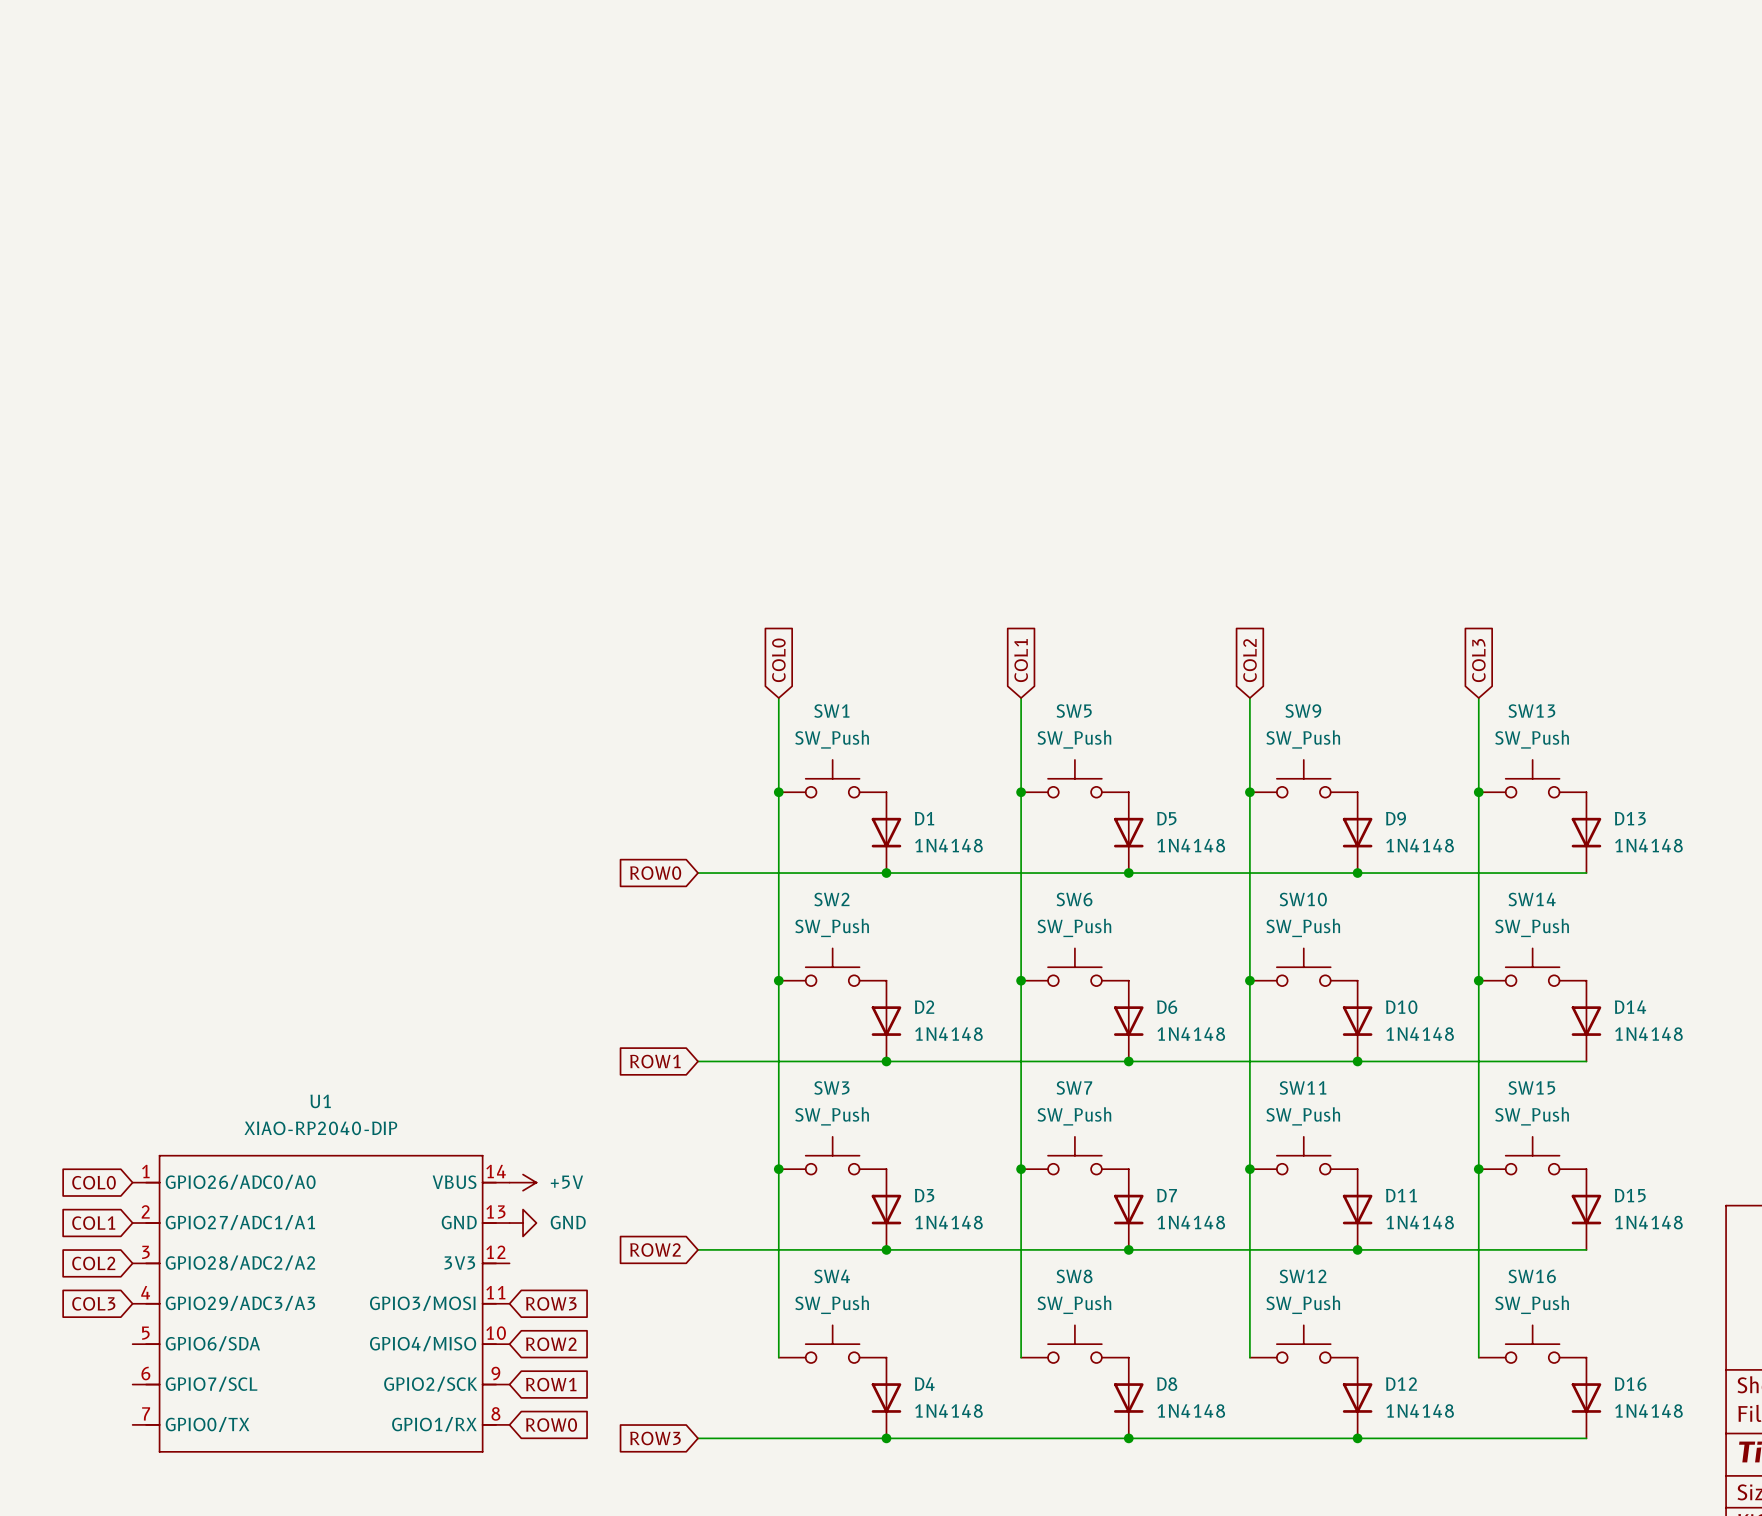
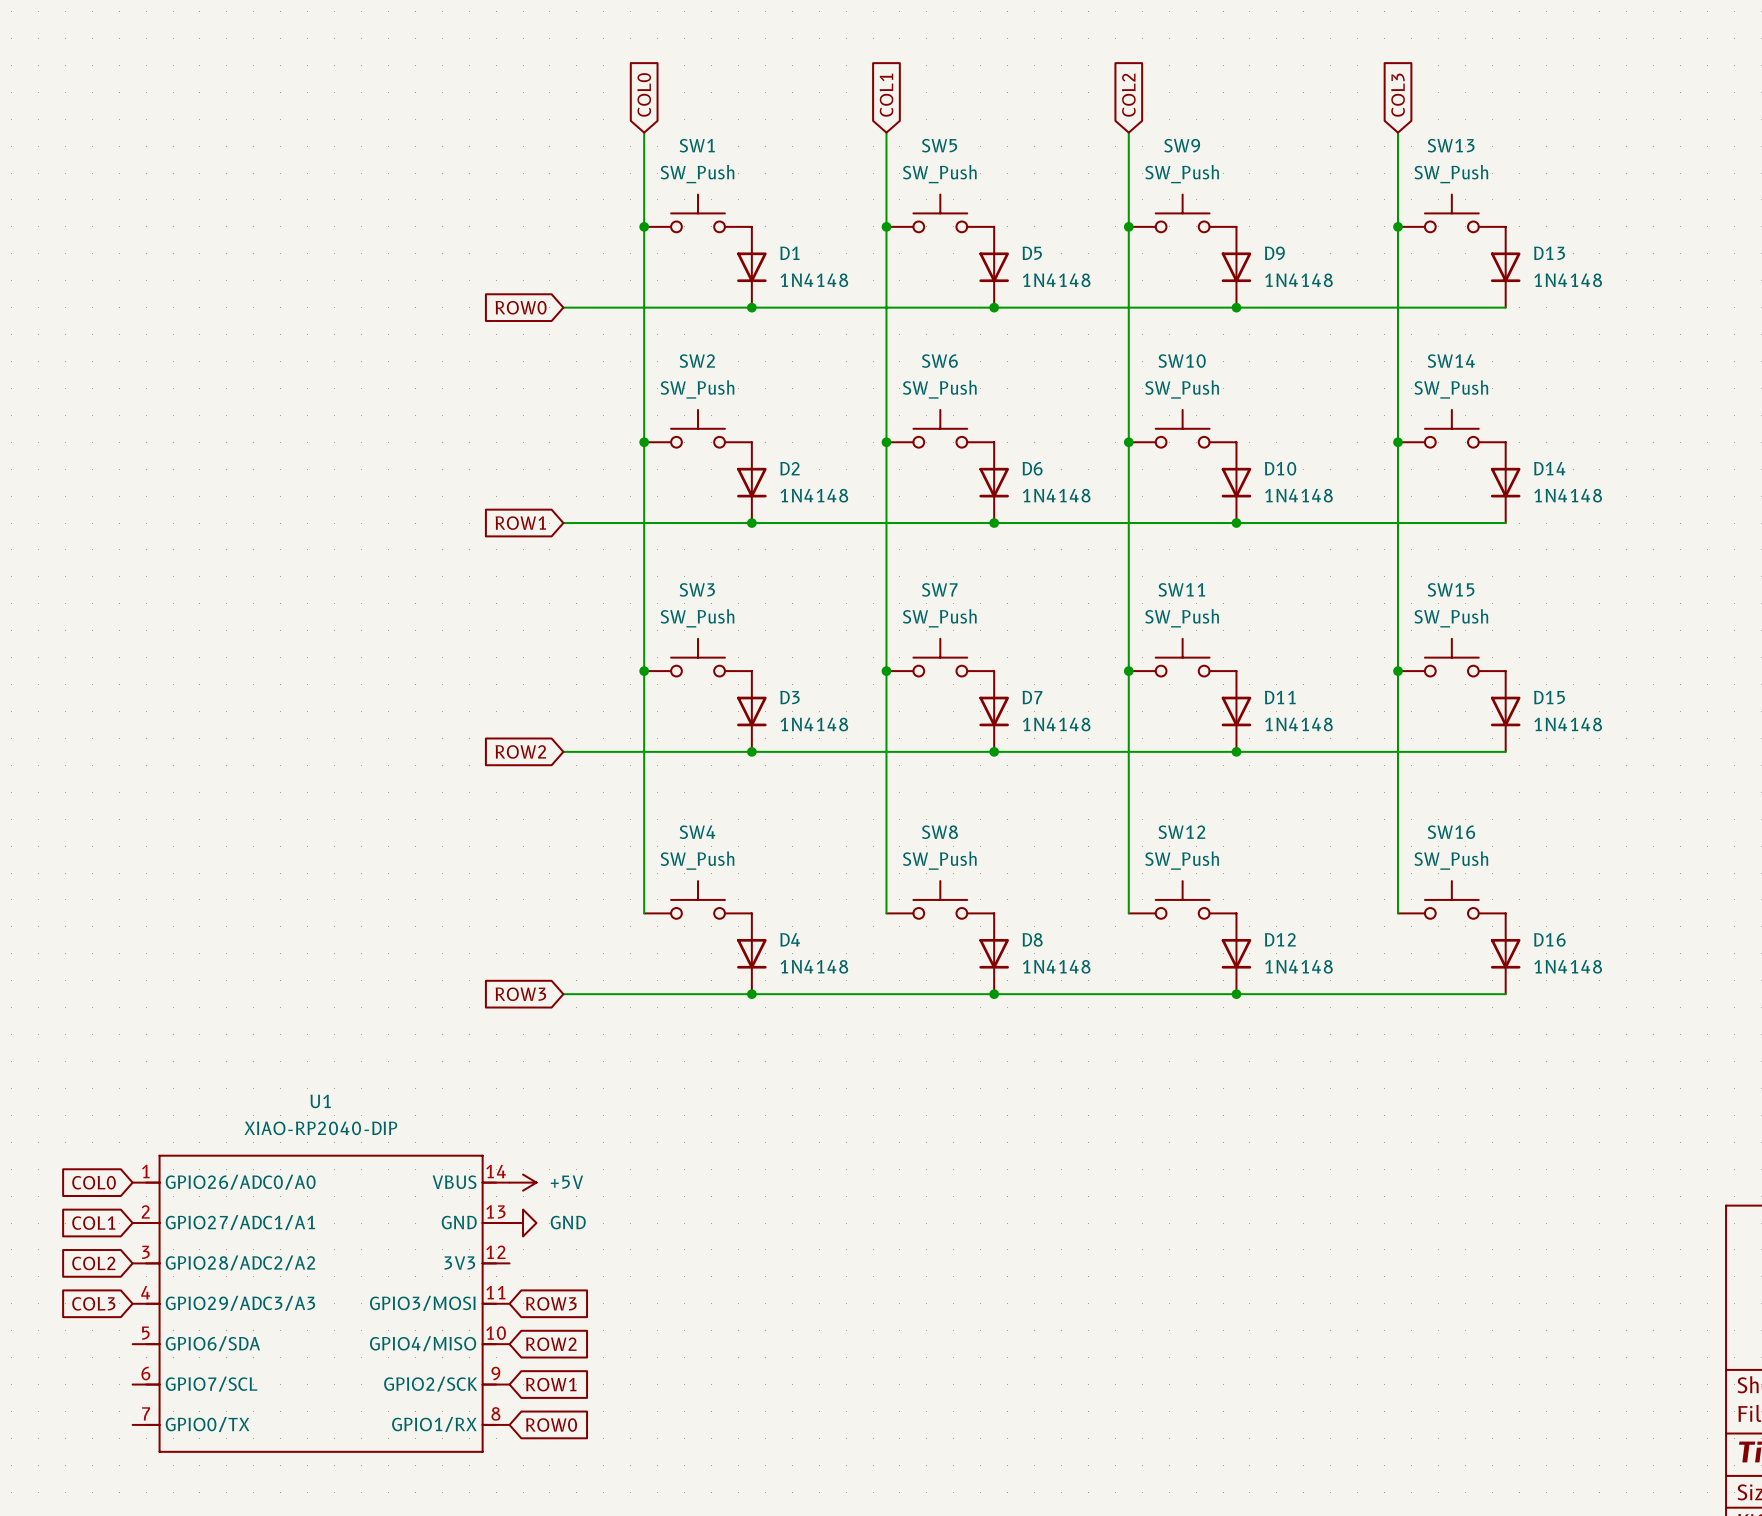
global label: none -> COL0 (644, 94)
global label: none -> COL1 (886, 95)
global label: none -> COL2 (1128, 95)
global label: none -> COL3 (1398, 95)
wire: none -> (644, 132) (644, 913)
wire: none -> (886, 132) (886, 913)
wire: none -> (1128, 132) (1128, 913)
wire: none -> (1398, 132) (1398, 913)
junction: none -> (644, 226)
junction: none -> (886, 226)
junction: none -> (1128, 226)
junction: none -> (1398, 226)
global label: none -> ROW0 (521, 307)
wire: none -> (563, 307) (1505, 307)
junction: none -> (751, 307)
junction: none -> (994, 307)
junction: none -> (1236, 307)
junction: none -> (644, 442)
junction: none -> (886, 442)
junction: none -> (1128, 442)
junction: none -> (1398, 442)
global label: none -> ROW1 (520, 523)
wire: none -> (563, 523) (1505, 523)
junction: none -> (751, 523)
junction: none -> (994, 523)
junction: none -> (1236, 523)
global label: COL0 (778, 660) -> none
global label: COL1 (1021, 660) -> none
global label: COL2 (1250, 660) -> none
global label: COL3 (1478, 660) -> none
junction: none -> (644, 671)
junction: none -> (886, 671)
junction: none -> (1128, 671)
junction: none -> (1398, 671)
wire: (778, 698) (778, 1357) -> none
wire: (1021, 698) (1021, 1357) -> none
wire: (1249, 698) (1249, 1357) -> none
wire: (1478, 698) (1478, 1357) -> none
global label: none -> ROW2 (520, 751)
wire: none -> (563, 751) (1505, 751)
SW1 position: (832, 778) -> (698, 213)
SW5 position: (1074, 778) -> (940, 213)
SW9 position: (1303, 778) -> (1182, 213)
SW13 position: (1532, 778) -> (1451, 213)
junction position: (778, 792) -> (751, 751)
junction position: (1021, 792) -> (994, 751)
junction position: (1249, 792) -> (1236, 751)
junction: (1478, 792) -> none
D1 position: (886, 832) -> (751, 267)
D5 position: (1128, 832) -> (994, 267)
D9 position: (1357, 832) -> (1236, 267)
D13 position: (1586, 832) -> (1505, 267)
global label: ROW0 (655, 873) -> none
wire: (698, 873) (1586, 873) -> none
junction: (886, 873) -> none
junction: (1128, 873) -> none
junction: (1357, 873) -> none
SW2 position: (832, 967) -> (698, 428)
SW6 position: (1074, 967) -> (940, 428)
SW10 position: (1303, 967) -> (1182, 428)
SW14 position: (1532, 967) -> (1451, 428)
junction position: (778, 980) -> (751, 994)
junction position: (1021, 980) -> (994, 994)
junction position: (1249, 980) -> (1236, 994)
junction: (1478, 980) -> none
global label: none -> ROW3 (520, 994)
wire: none -> (563, 994) (1505, 994)
D2 position: (886, 1021) -> (751, 482)
D6 position: (1128, 1021) -> (994, 482)
D10 position: (1357, 1021) -> (1236, 482)
D14 position: (1586, 1021) -> (1505, 482)
global label: ROW1 (655, 1061) -> none
wire: (698, 1061) (1586, 1061) -> none
junction: (886, 1061) -> none
junction: (1128, 1061) -> none
junction: (1357, 1061) -> none
SW3 position: (832, 1155) -> (698, 657)
SW7 position: (1074, 1155) -> (940, 657)
SW11 position: (1303, 1155) -> (1182, 657)
SW15 position: (1532, 1155) -> (1451, 657)
junction: (778, 1169) -> none
junction: (1021, 1169) -> none
junction: (1249, 1169) -> none
junction: (1478, 1169) -> none
D3 position: (886, 1209) -> (751, 711)
D7 position: (1128, 1209) -> (994, 711)
D11 position: (1357, 1209) -> (1236, 711)
D15 position: (1586, 1209) -> (1505, 711)
wire: (698, 1249) (1586, 1249) -> none
junction: (886, 1249) -> none
junction: (1128, 1249) -> none
junction: (1357, 1249) -> none
global label: ROW2 (655, 1250) -> none
SW4 position: (832, 1344) -> (698, 899)
SW8 position: (1074, 1344) -> (940, 899)
SW12 position: (1303, 1344) -> (1182, 899)
SW16 position: (1532, 1344) -> (1451, 899)
D4 position: (886, 1398) -> (751, 953)
D8 position: (1128, 1398) -> (994, 953)
D12 position: (1357, 1398) -> (1236, 953)
D16 position: (1586, 1398) -> (1505, 953)
global label: ROW3 (655, 1438) -> none
wire: (698, 1438) (1586, 1438) -> none
junction: (886, 1438) -> none
junction: (1128, 1438) -> none
junction: (1357, 1438) -> none

